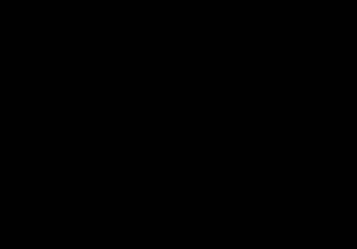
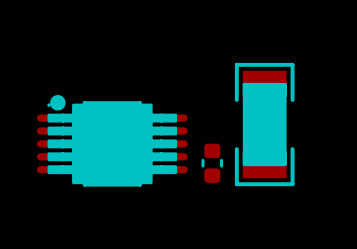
part: none -> (264, 124)
part: none -> (112, 140)
part: none -> (212, 163)

